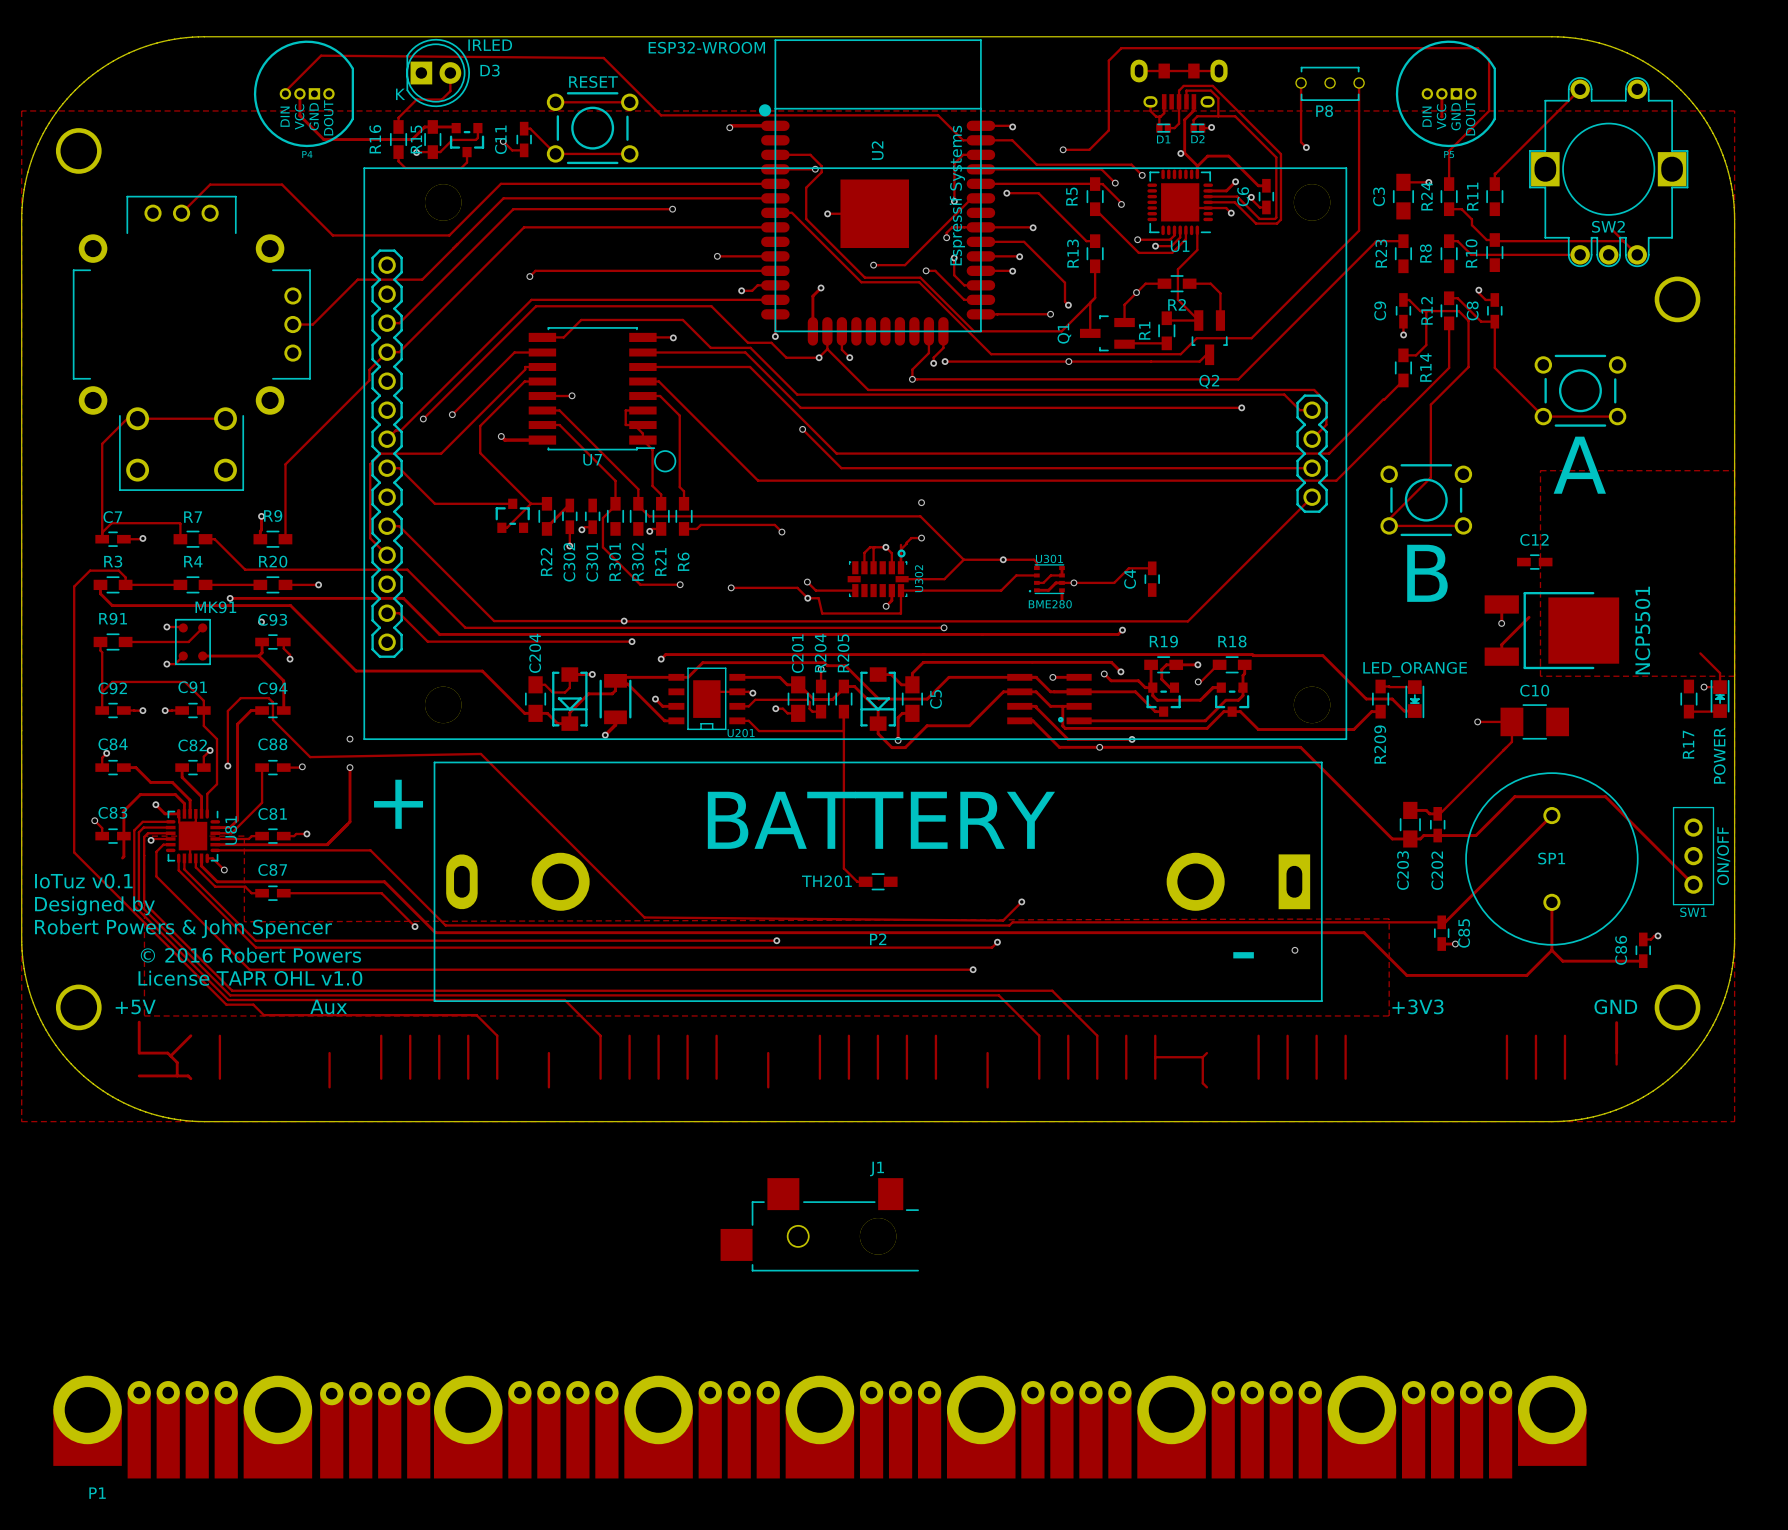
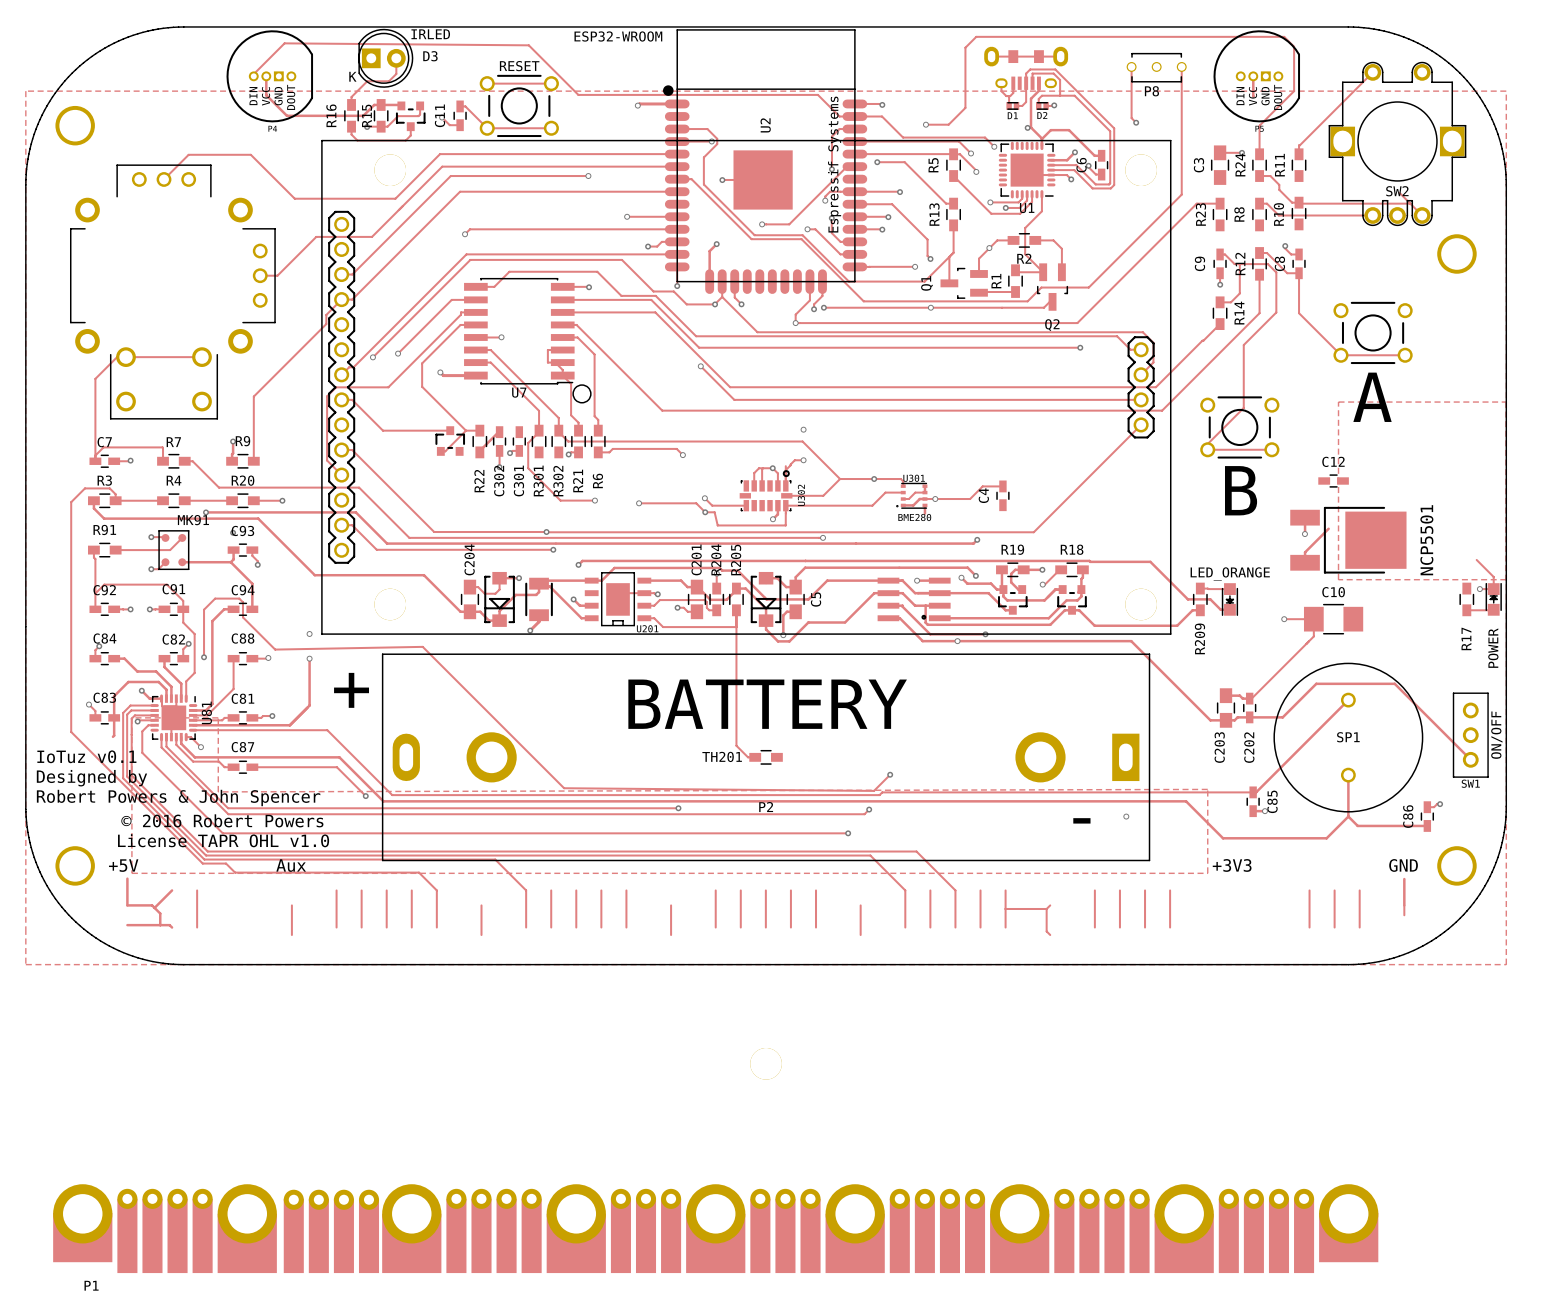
J1: (819, 1224) -> none

